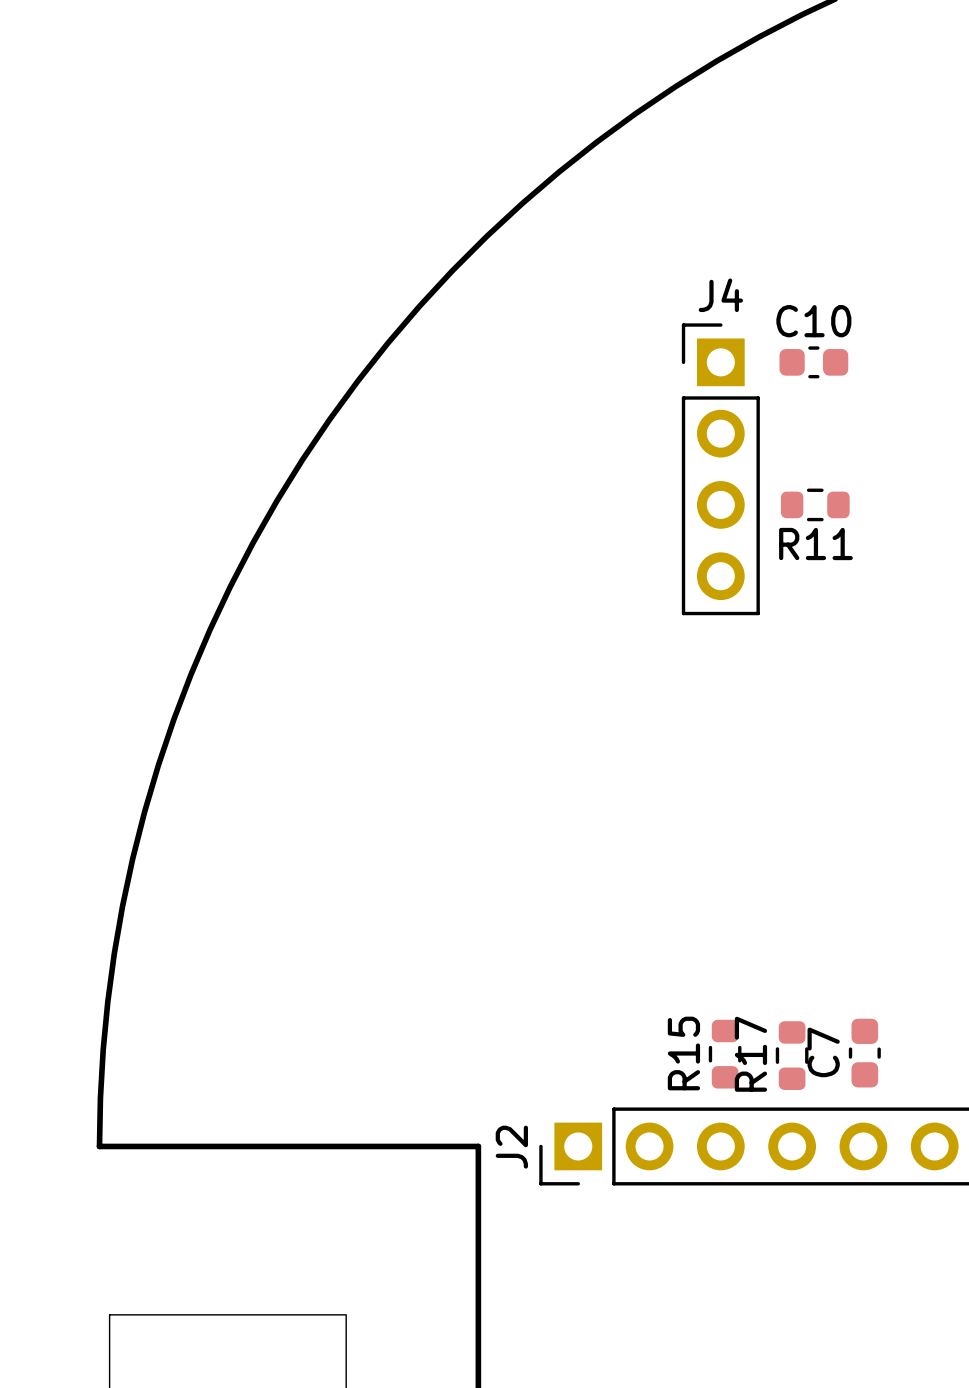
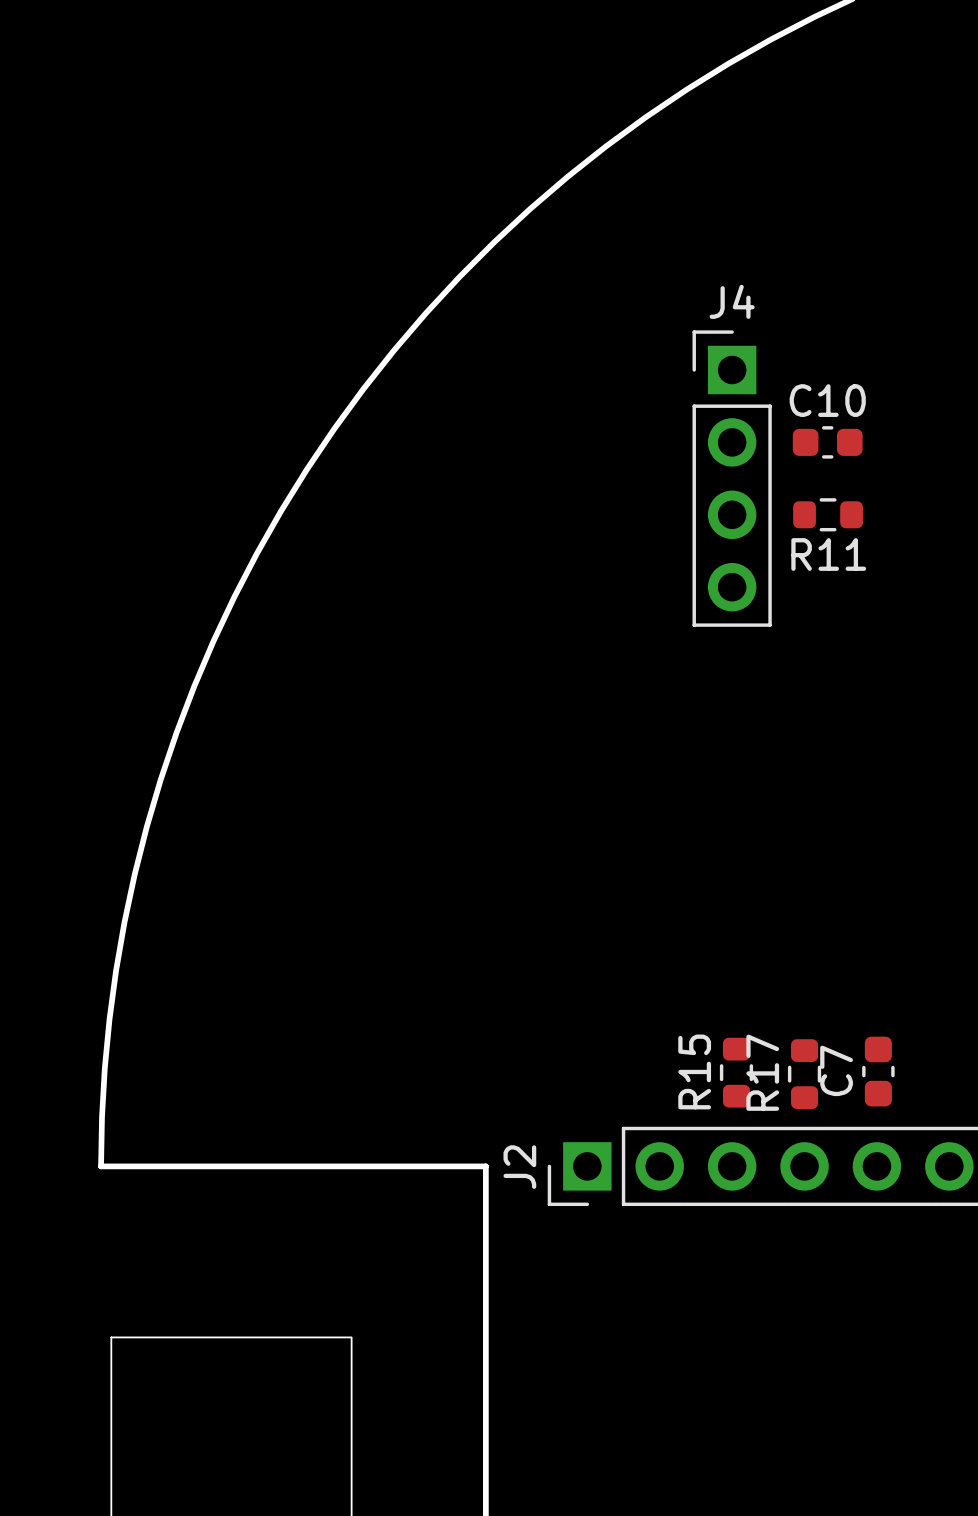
C10 position: (813, 362) -> (827, 442)

